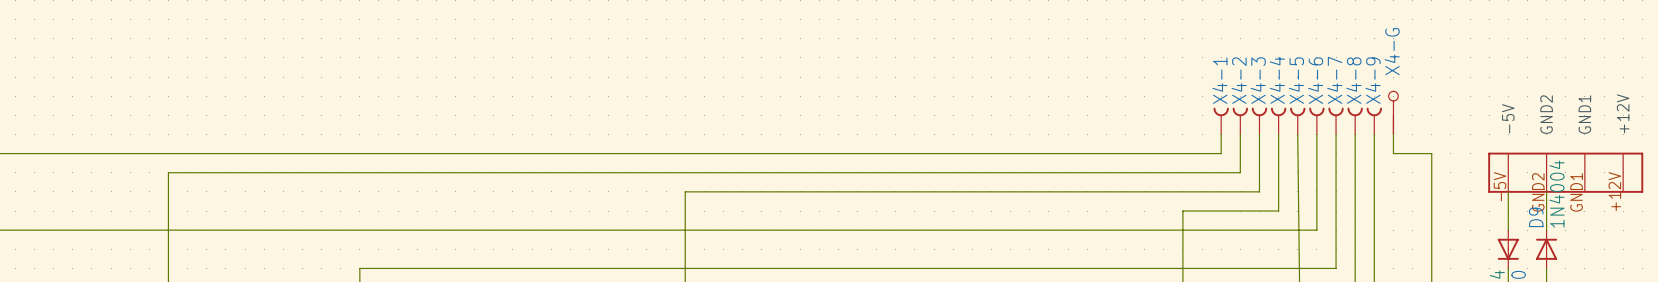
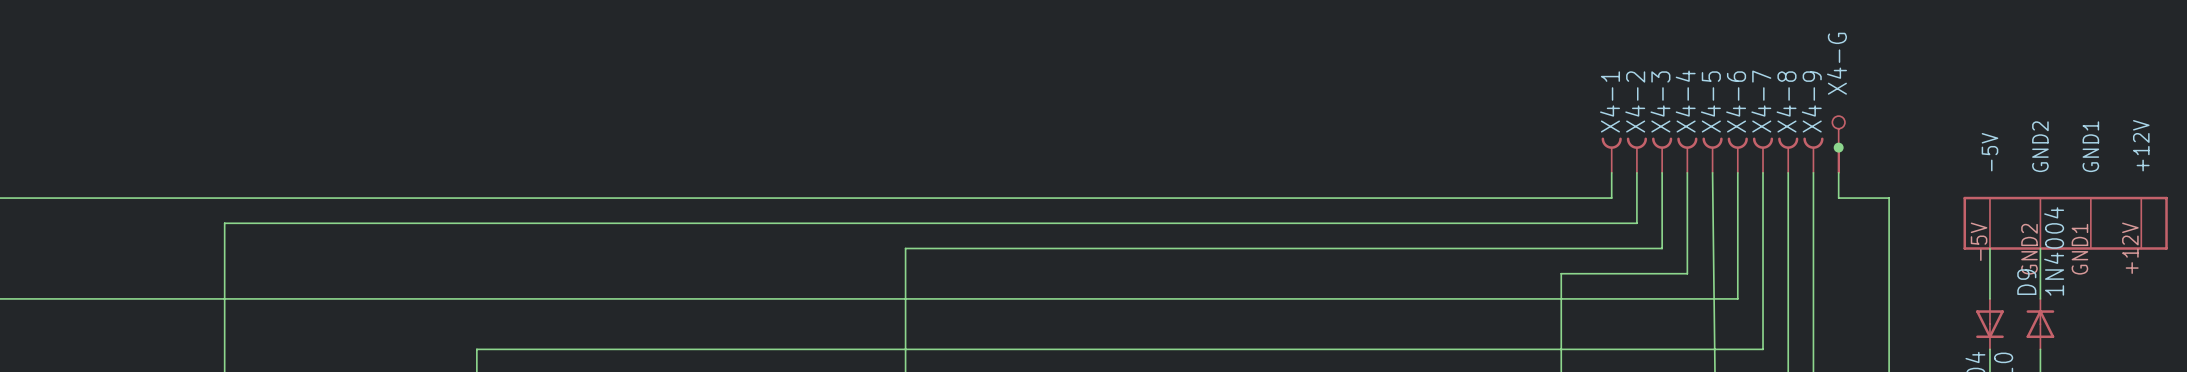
junction: none -> (1838, 147)

